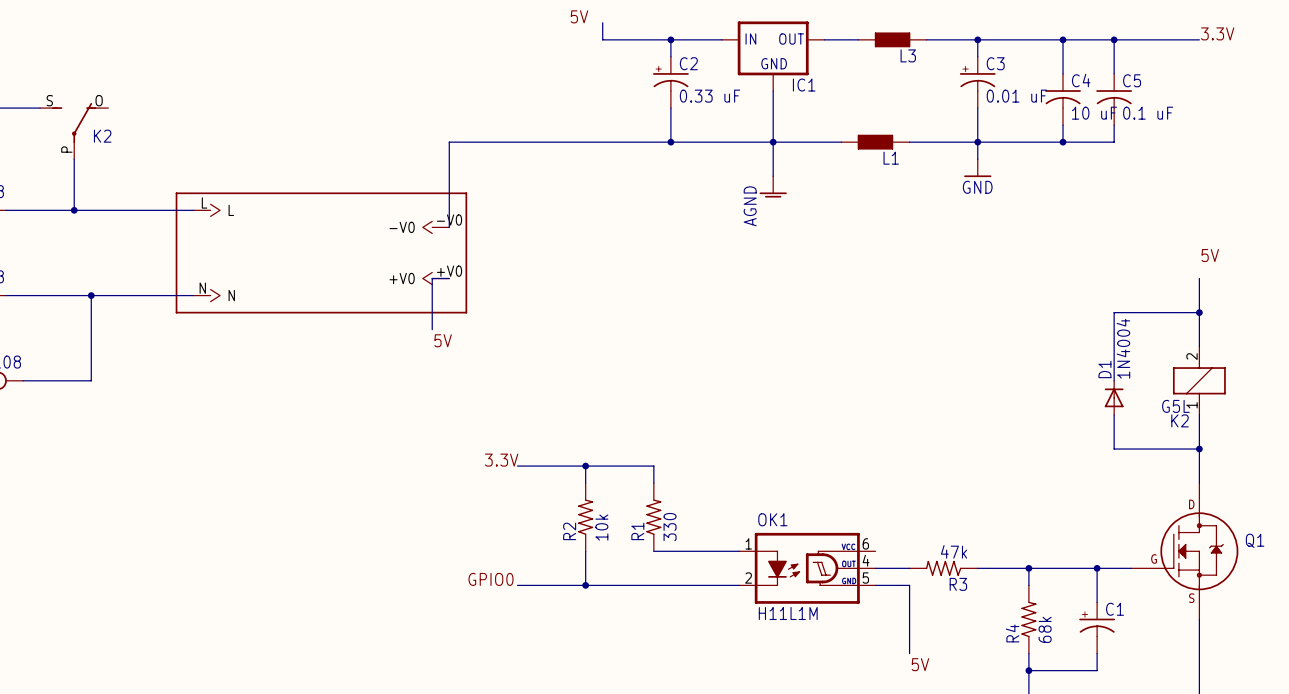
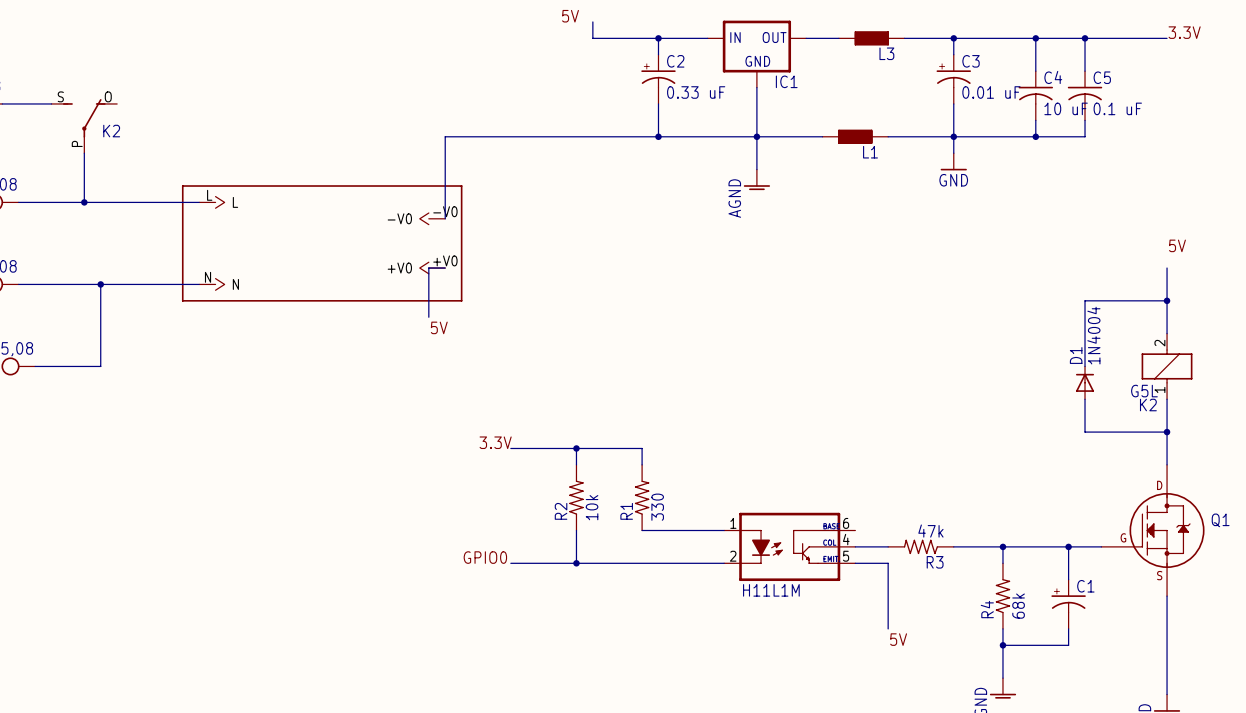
OK1: H11L1M (807, 568) -> none
part: none -> H11L1M (789, 546)

